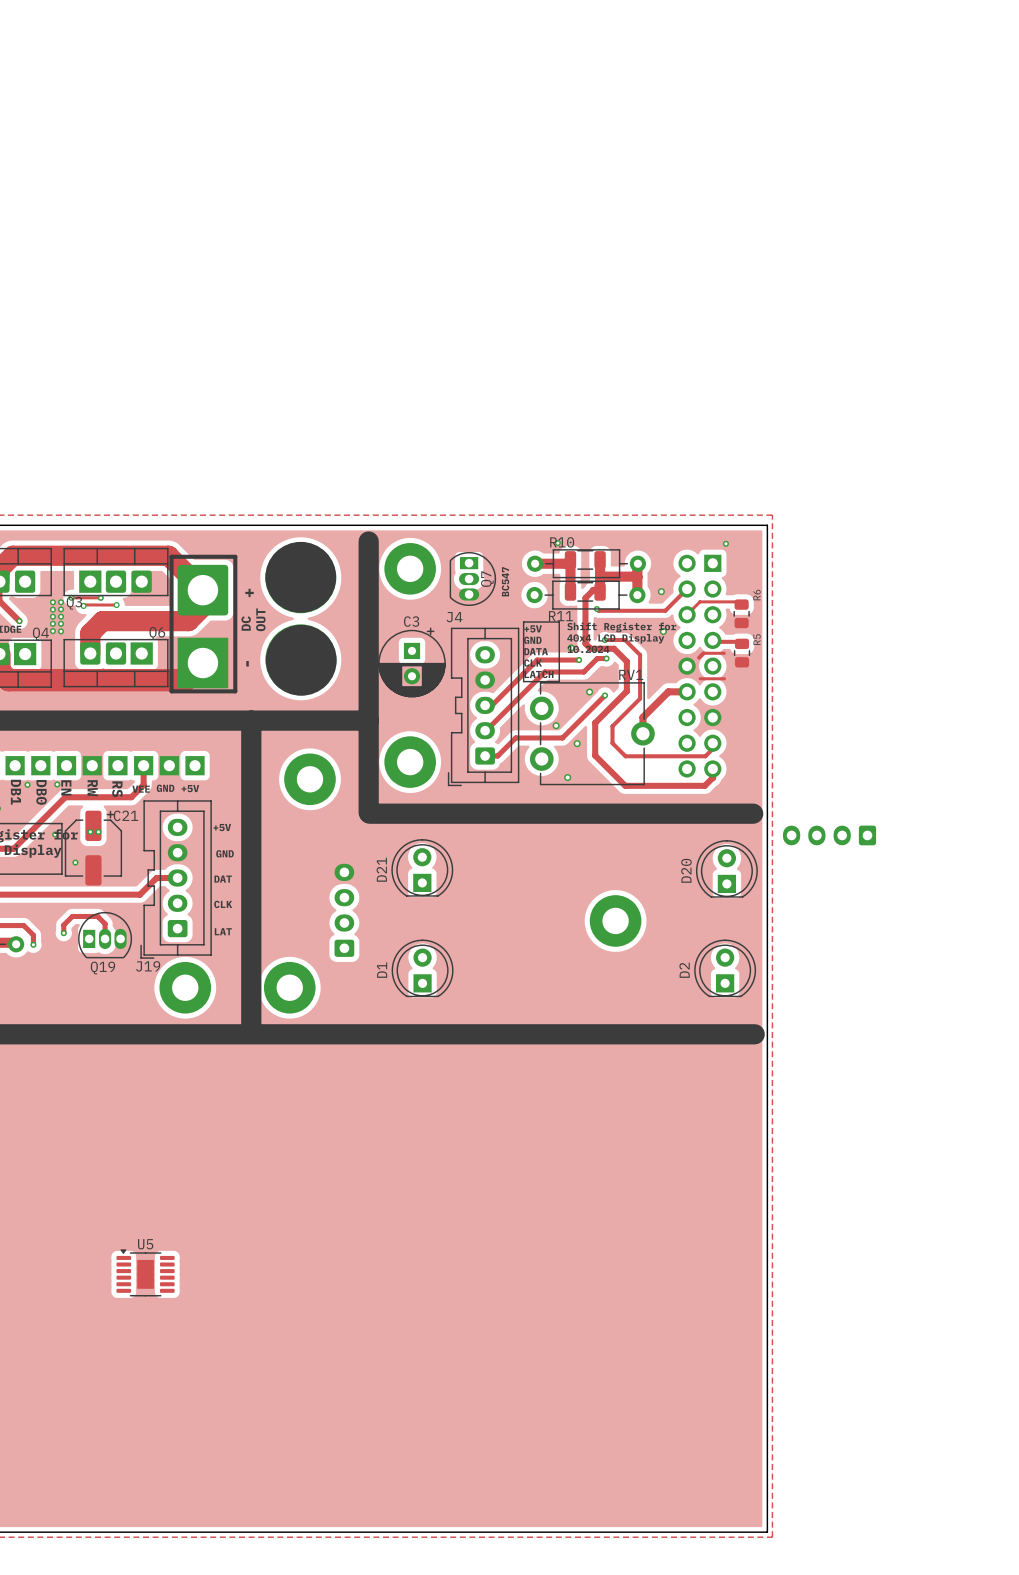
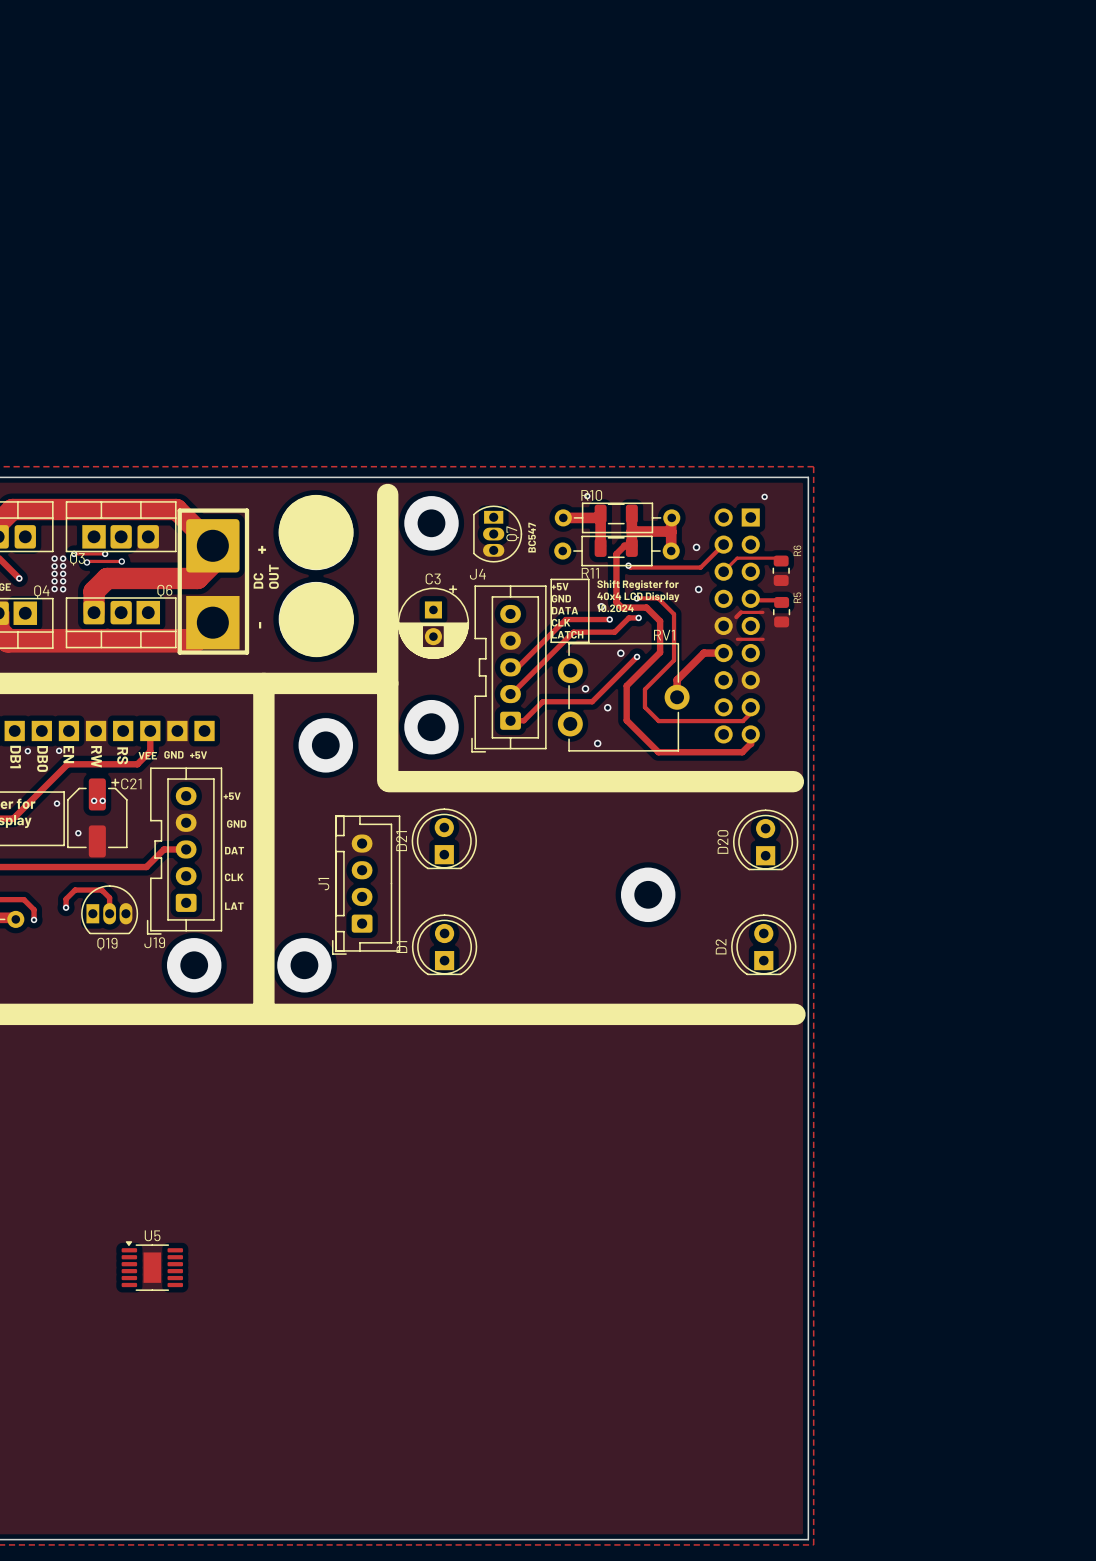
part: (829, 835) -> none
J1 side: bottom (344, 910) -> top (366, 885)

